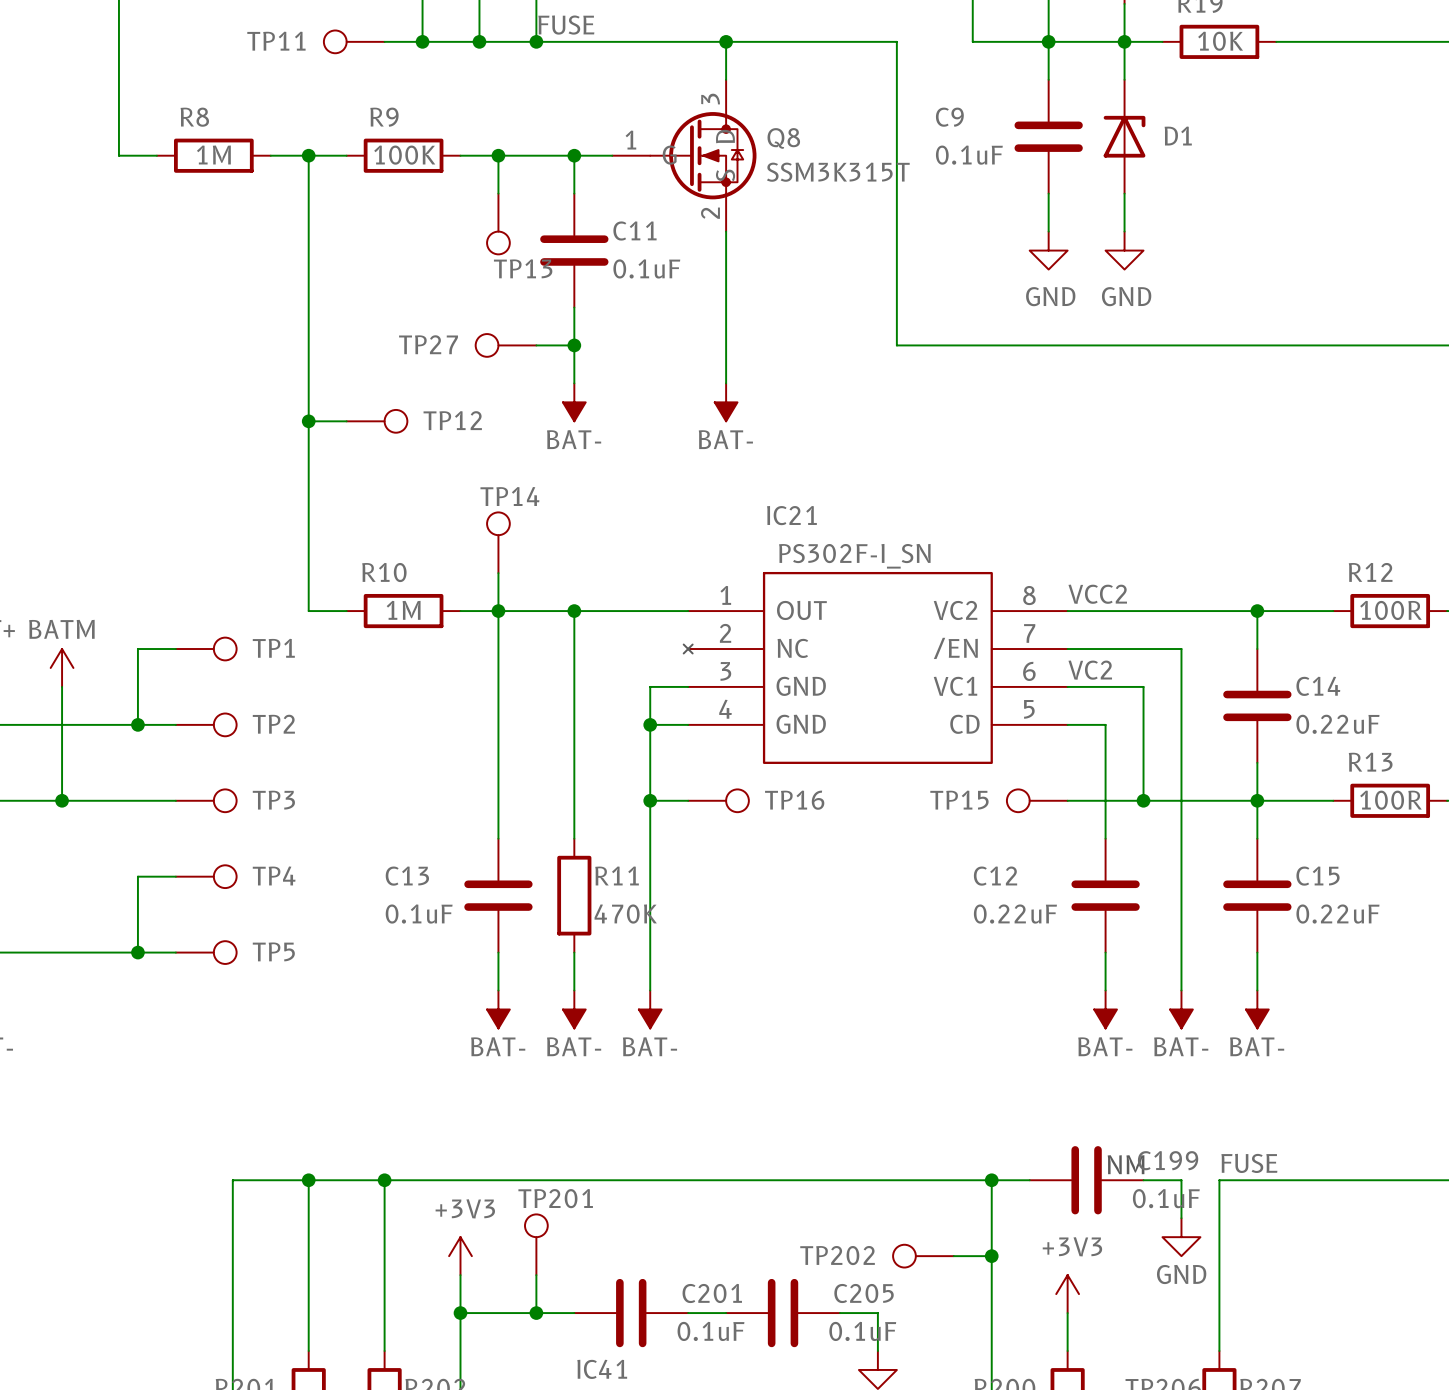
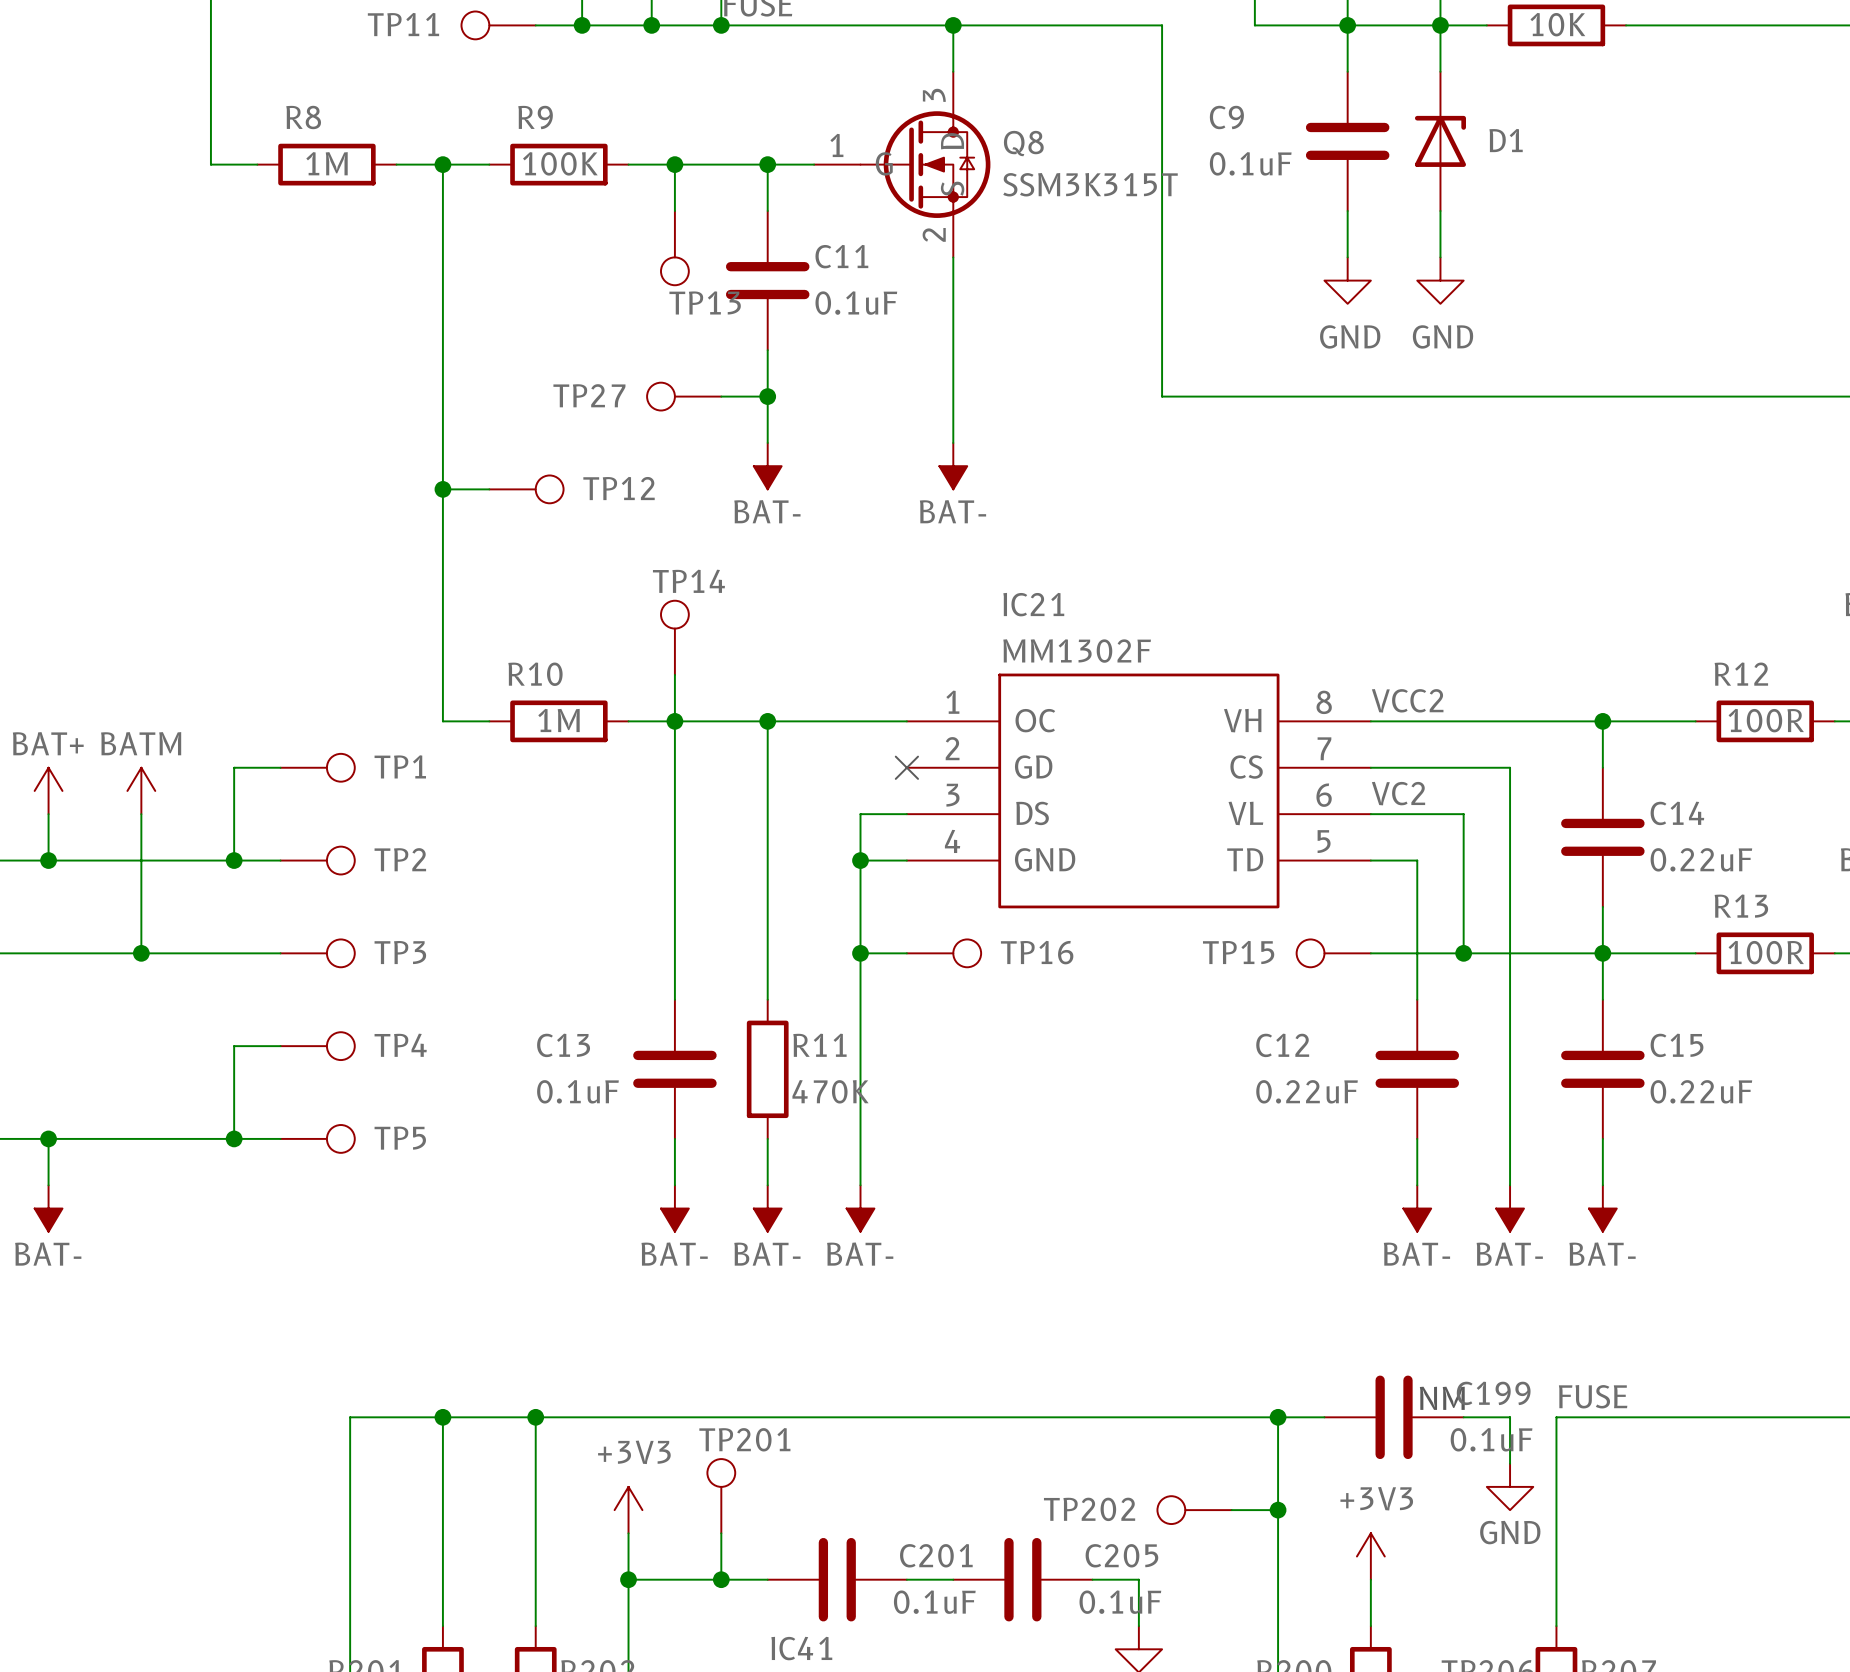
IC21 value: PS302F-I_SN (854, 556) -> MM1302F (1077, 651)
IC21 symbol: [683, 571, 1068, 764] -> [906, 673, 1371, 909]
no-connect mark: none -> (906, 767)

